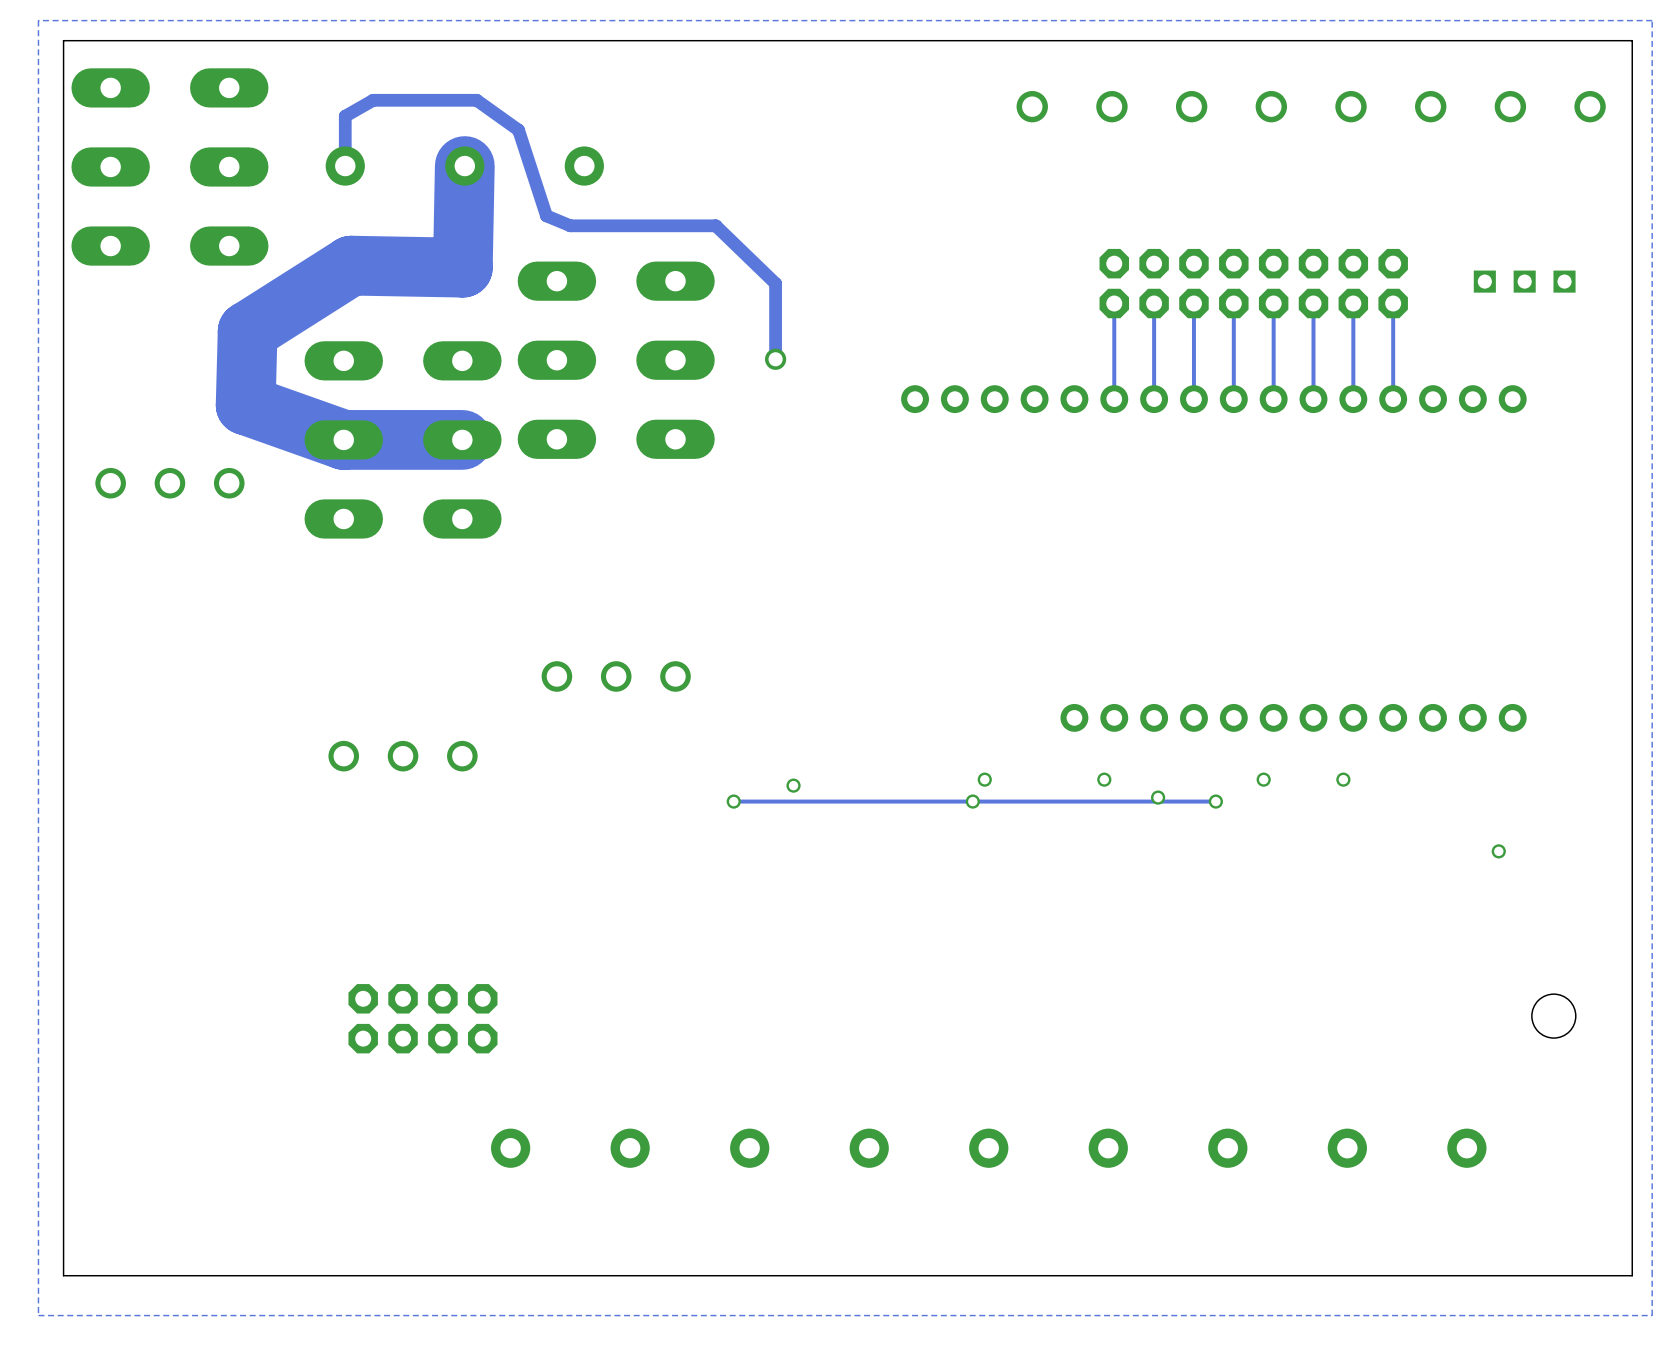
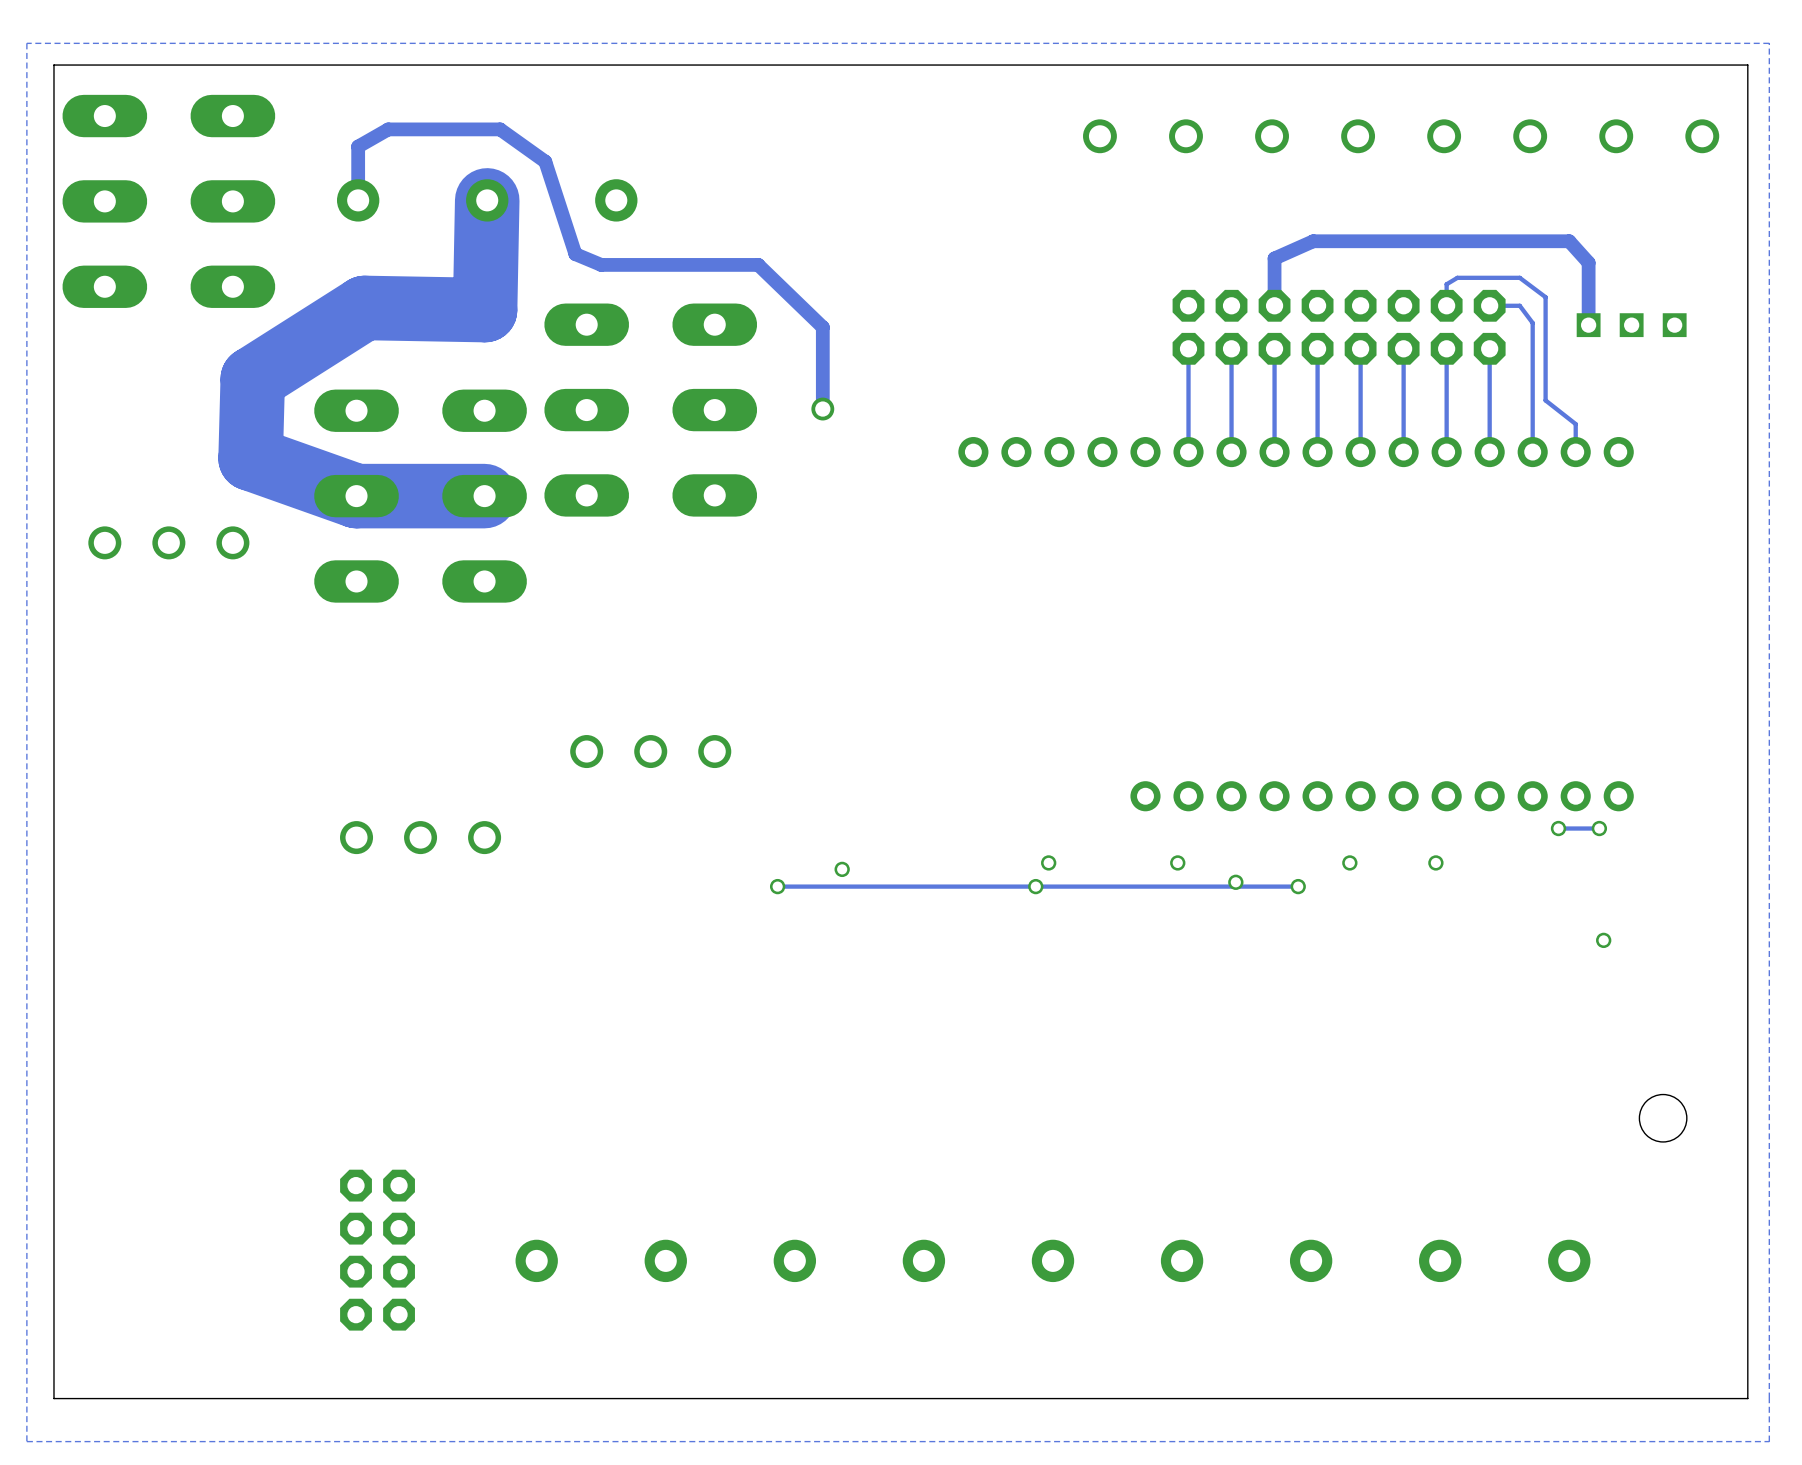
track: none -> (1274, 305) (1274, 258) (1313, 241) (1569, 241) (1588, 262) (1588, 325)
track: none -> (1446, 305) (1446, 284) (1457, 277) (1519, 277) (1545, 297) (1545, 400) (1575, 424) (1575, 452)
track: none -> (1489, 305) (1519, 305) (1532, 323) (1532, 452)
via: none -> (1558, 828)
track: none -> (1599, 828) (1558, 828)
via: none -> (1599, 828)
part rotation: 0° (422, 1018) -> 90° clockwise (377, 1250)
part position: (422, 1018) -> (377, 1250)

